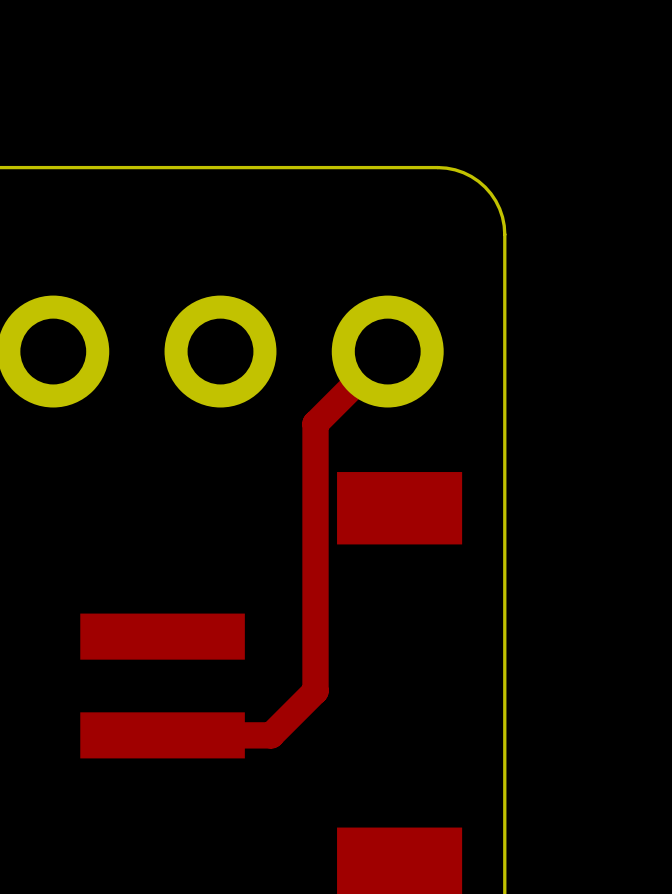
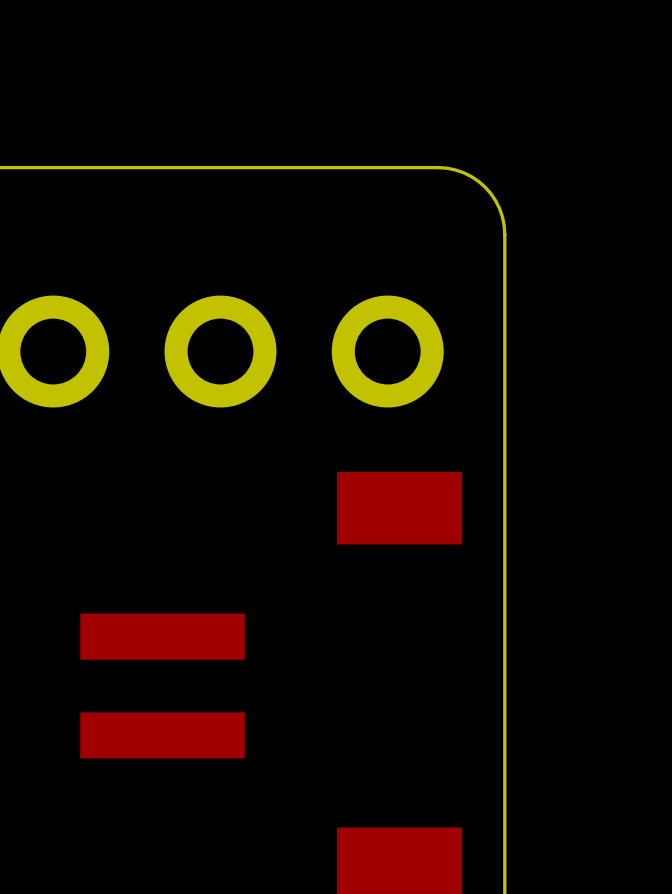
top track: (387, 351) (315, 423) (315, 691) (271, 735) (162, 735) -> none

